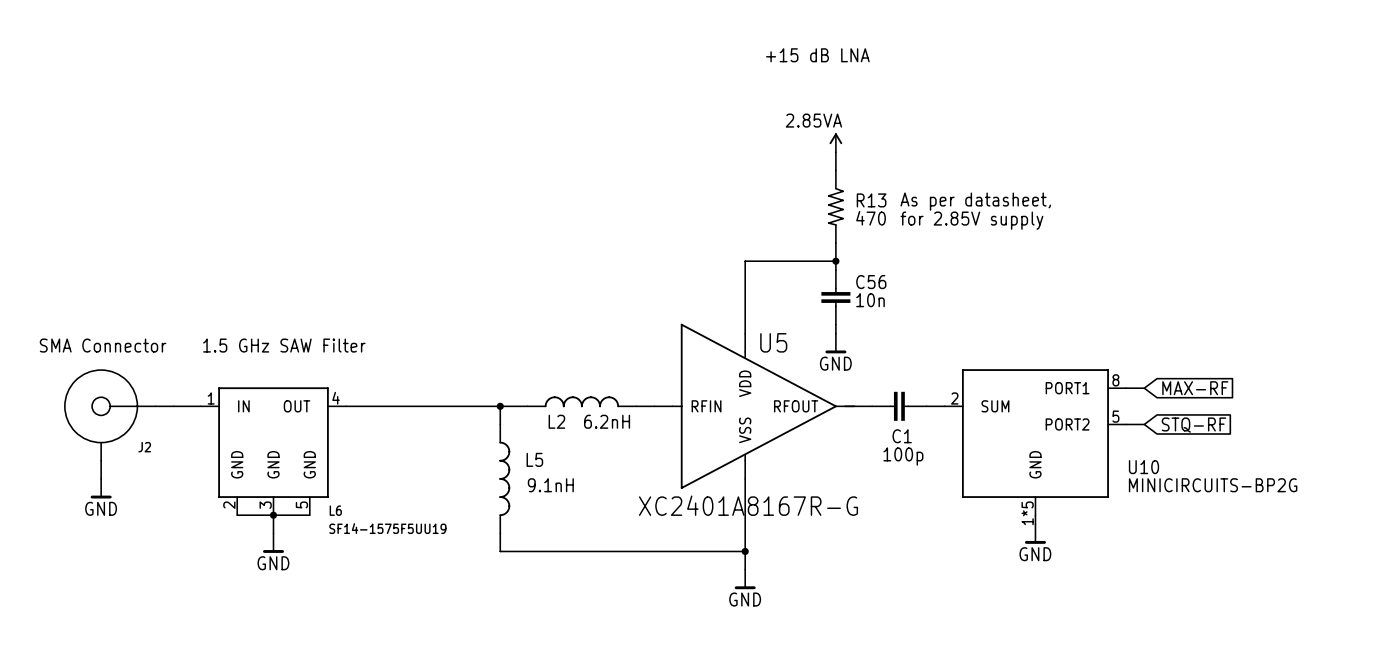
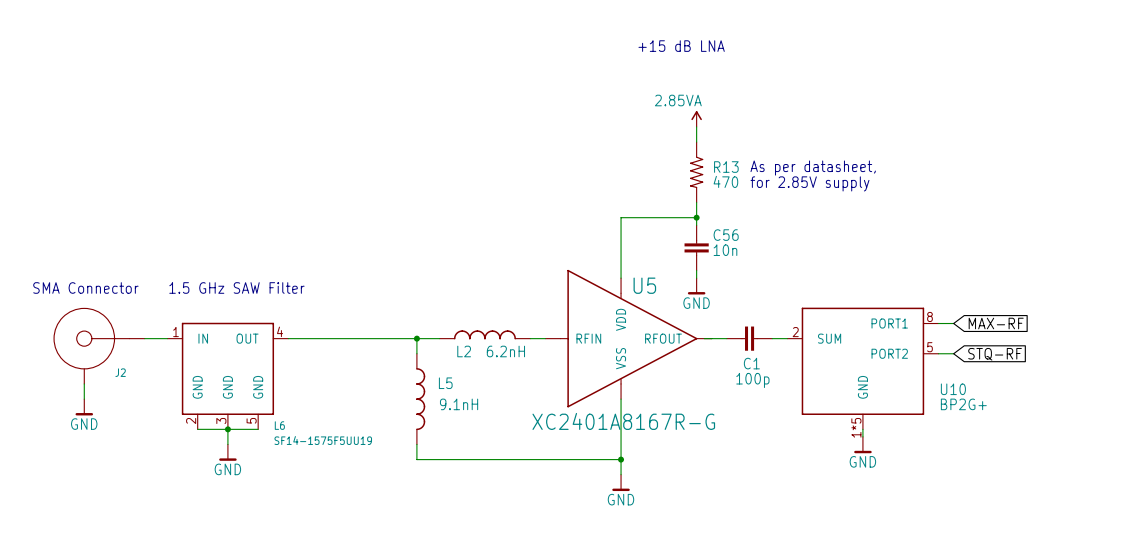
U10 value: MINICIRCUITS-BP2G (1213, 485) -> BP2G+ (963, 404)

